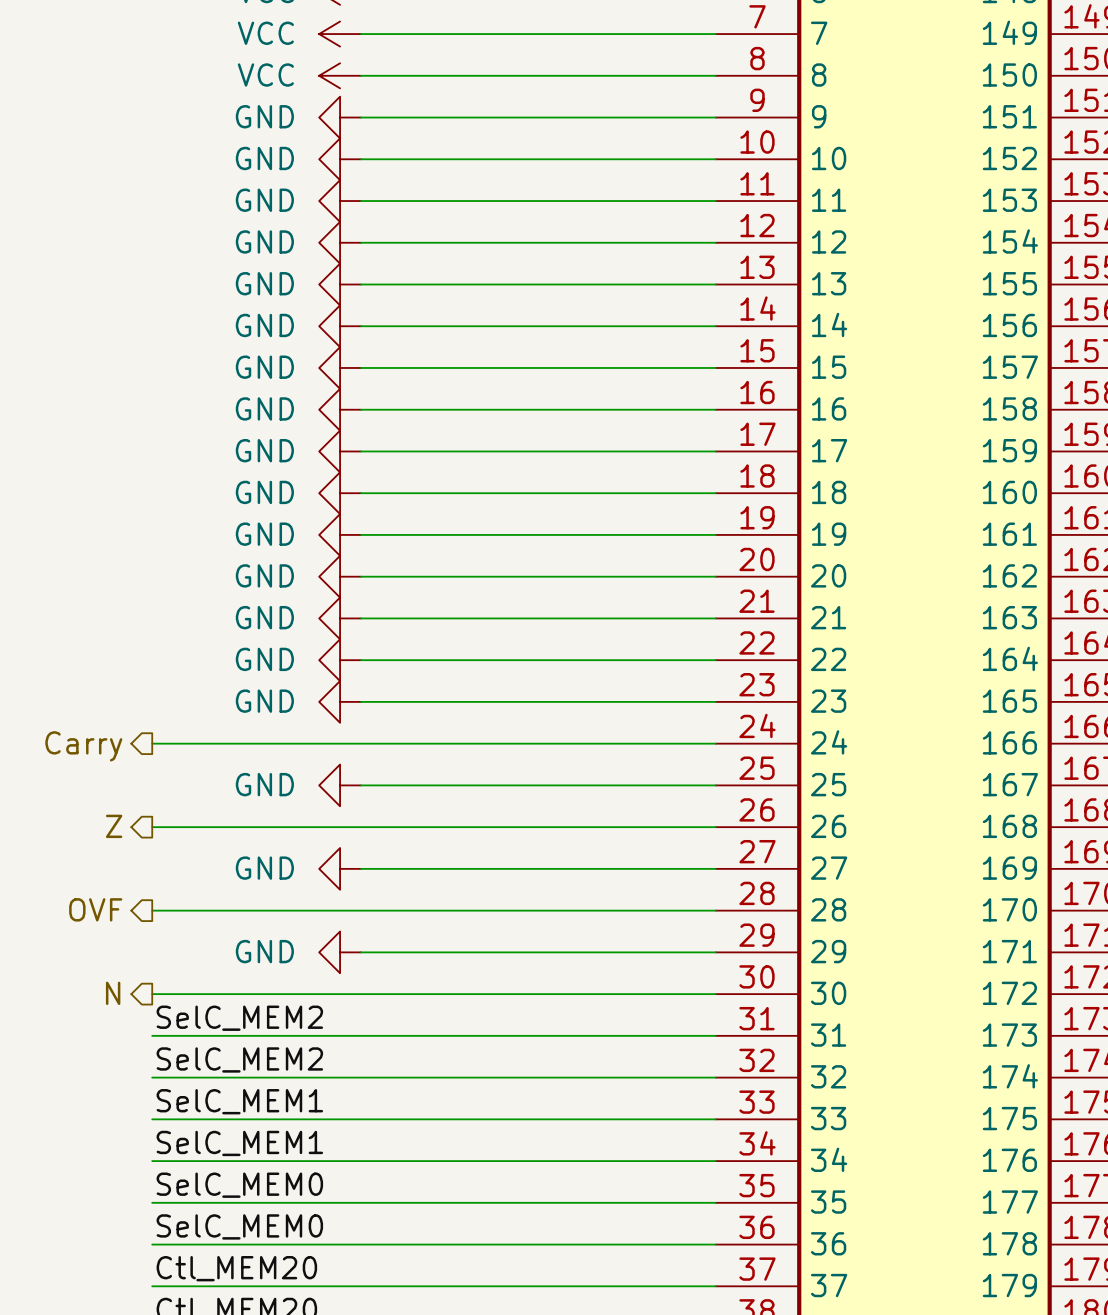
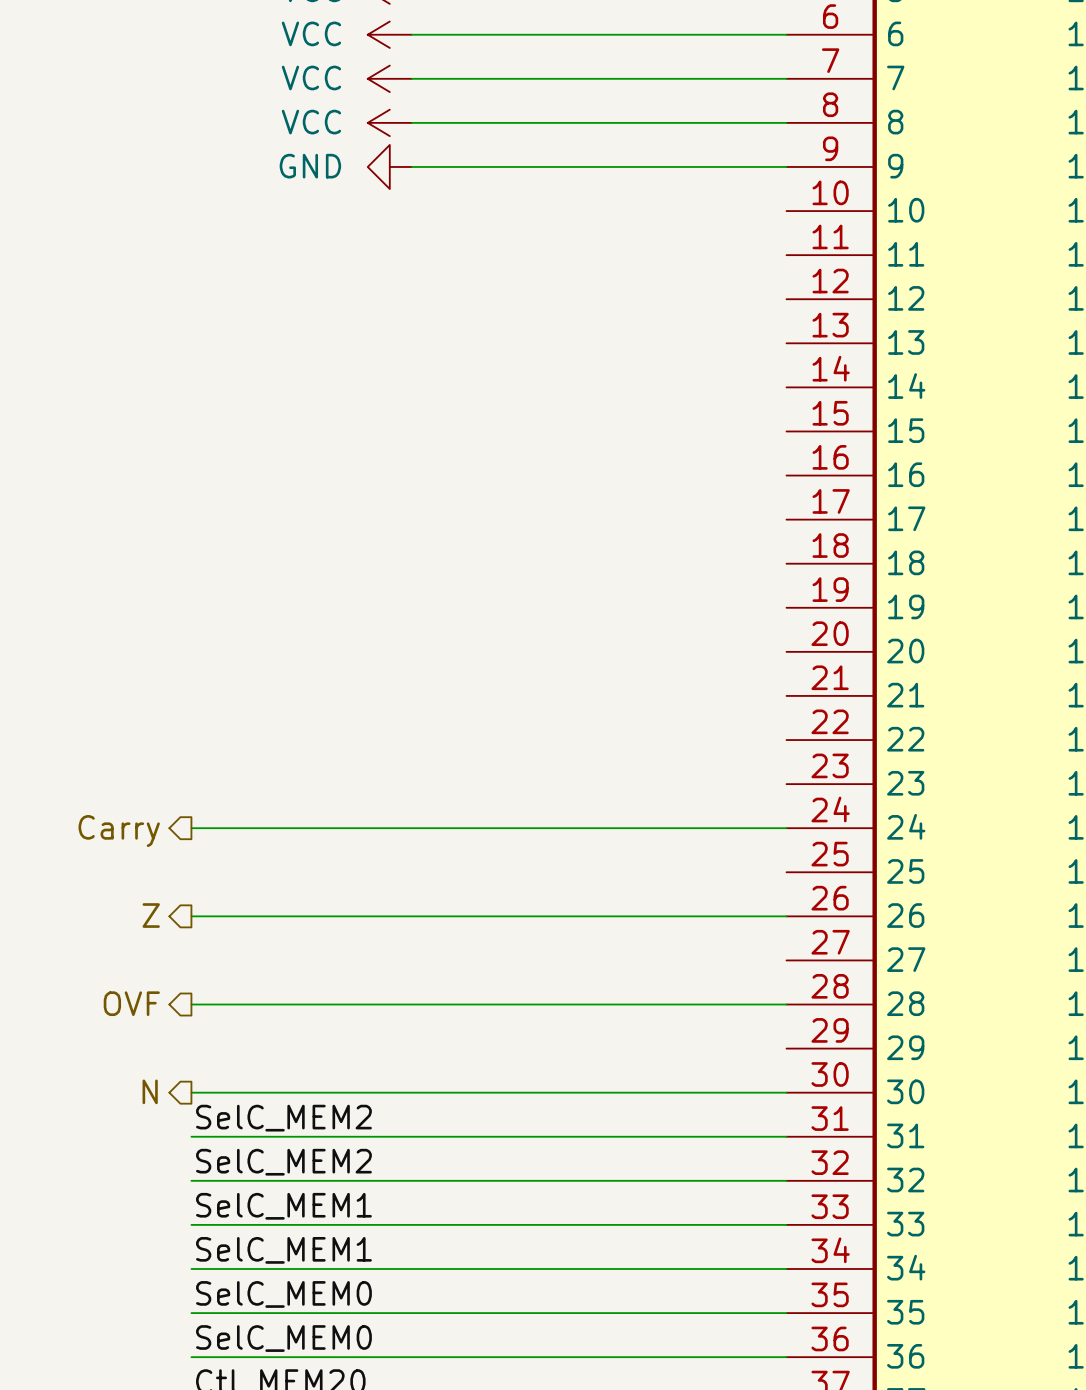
power symbol: GND (340, 159) -> none
wire: (360, 159) (715, 159) -> none
power symbol: GND (340, 201) -> none
wire: (360, 201) (715, 201) -> none
power symbol: GND (340, 242) -> none
wire: (360, 242) (715, 242) -> none
power symbol: GND (340, 284) -> none
wire: (360, 284) (715, 284) -> none
power symbol: GND (340, 326) -> none
wire: (360, 326) (715, 326) -> none
power symbol: GND (340, 367) -> none
wire: (360, 367) (715, 367) -> none
power symbol: GND (340, 409) -> none
wire: (360, 409) (715, 409) -> none
power symbol: GND (340, 451) -> none
wire: (360, 451) (715, 451) -> none
power symbol: GND (340, 493) -> none
wire: (360, 493) (715, 493) -> none
power symbol: GND (340, 534) -> none
wire: (360, 534) (715, 534) -> none
power symbol: GND (340, 576) -> none
wire: (360, 576) (715, 576) -> none
power symbol: GND (340, 618) -> none
wire: (360, 618) (715, 618) -> none
power symbol: GND (340, 660) -> none
wire: (360, 660) (715, 660) -> none
power symbol: GND (340, 701) -> none
wire: (360, 701) (715, 701) -> none
power symbol: GND (340, 785) -> none
wire: (360, 785) (715, 785) -> none
power symbol: GND (340, 868) -> none
wire: (360, 868) (715, 868) -> none
power symbol: GND (340, 952) -> none
wire: (360, 952) (715, 952) -> none

